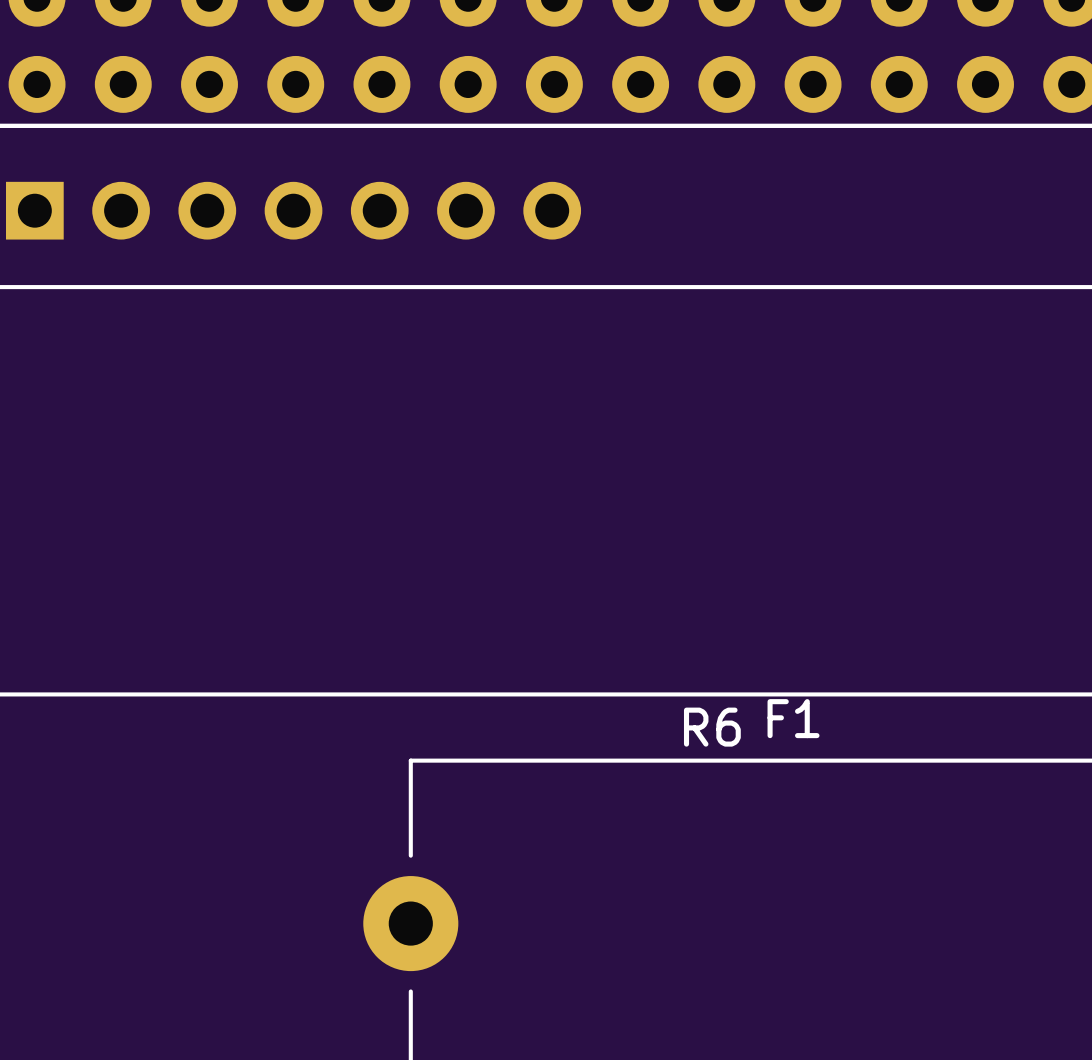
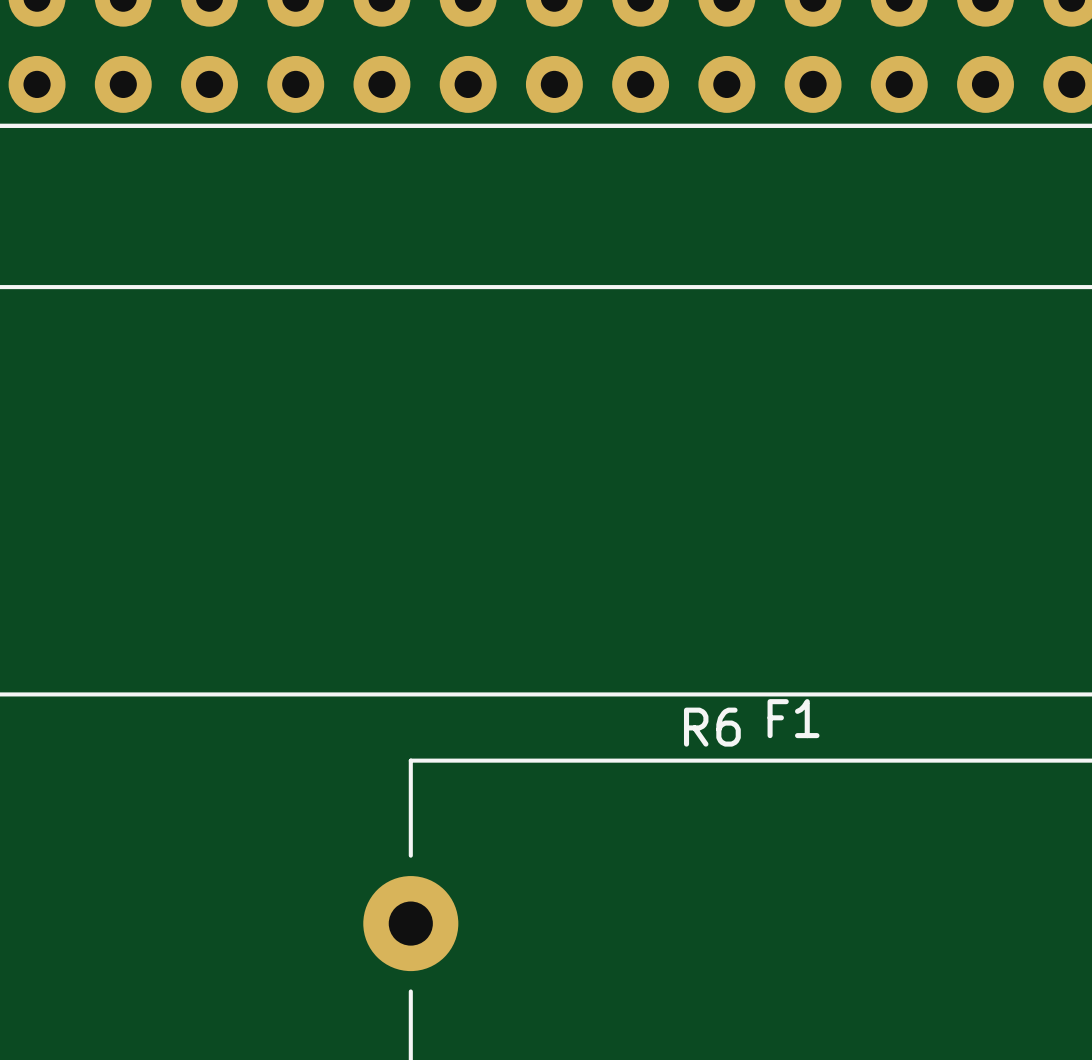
part: (293, 210) -> none

